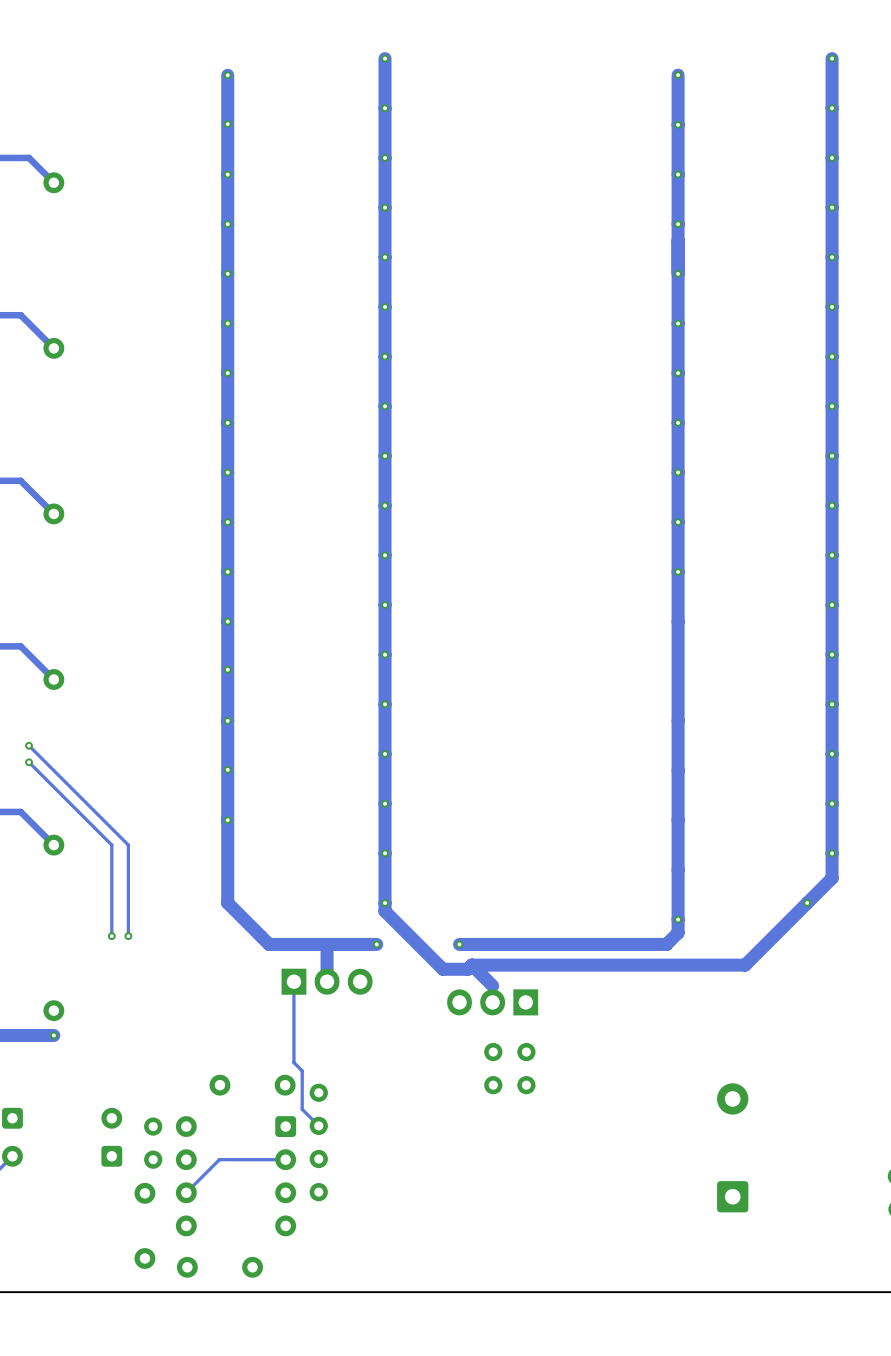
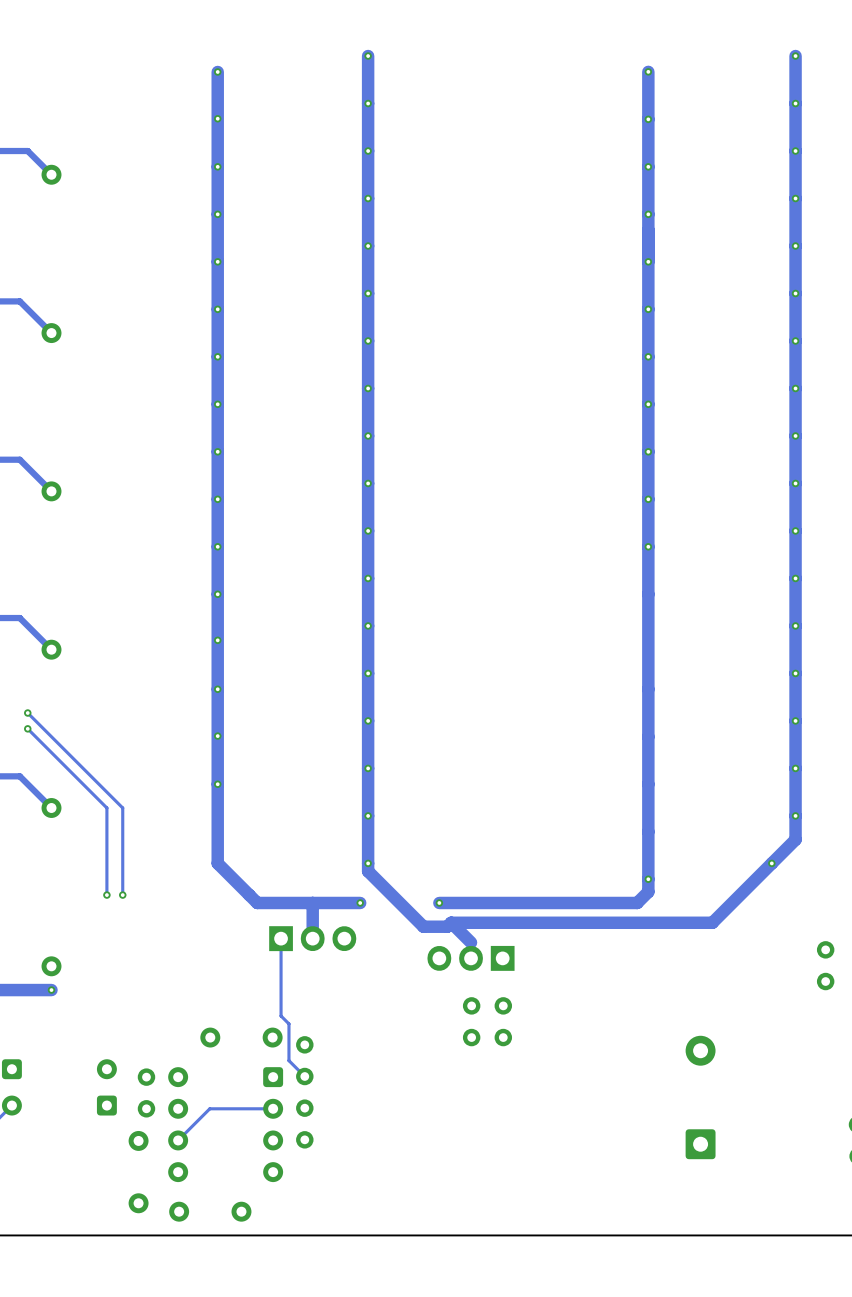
part: none -> (825, 965)

